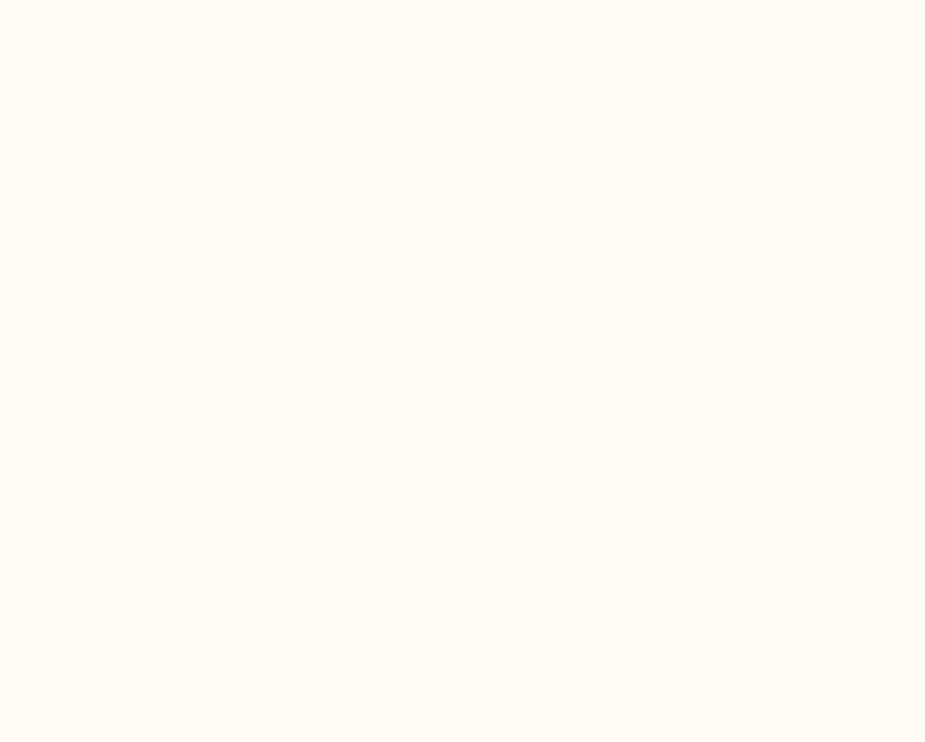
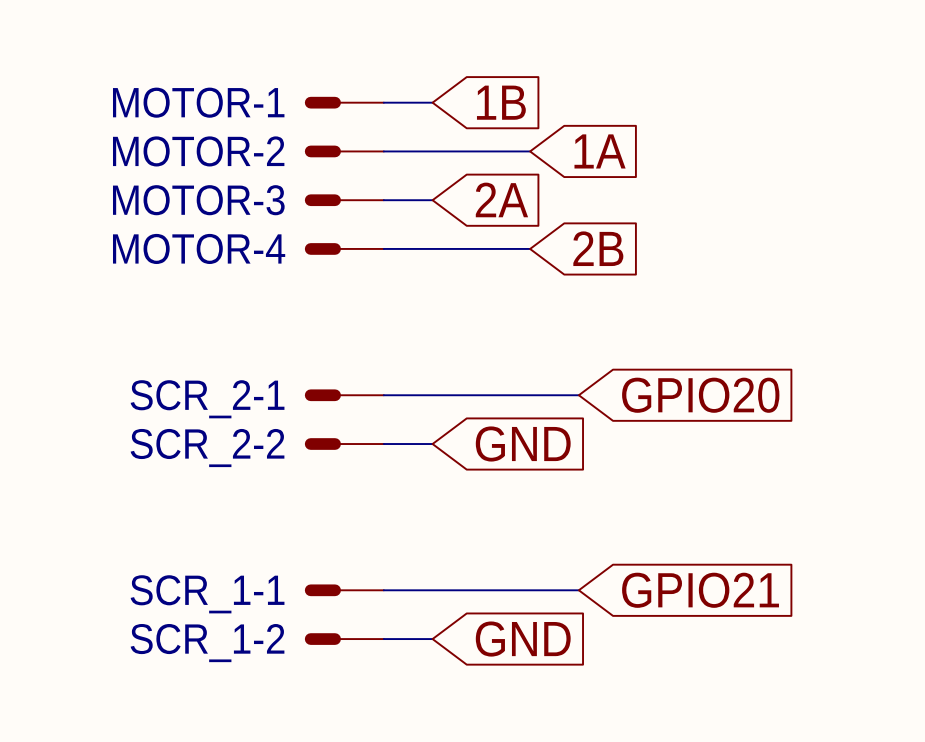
MOTOR-1: none -> (344, 102)
wire: none -> (383, 102) (432, 102)
global label: none -> 1B (501, 102)
MOTOR-2: none -> (344, 151)
wire: none -> (383, 151) (530, 151)
global label: none -> 1A (600, 151)
global label: none -> 2A (501, 199)
MOTOR-3: none -> (344, 200)
wire: none -> (383, 200) (432, 200)
MOTOR-4: none -> (344, 248)
wire: none -> (383, 248) (530, 248)
global label: none -> 2B (598, 248)
SCR_2-1: none -> (344, 395)
wire: none -> (383, 395) (578, 395)
global label: none -> GPIO20 (700, 395)
SCR_2-2: none -> (344, 444)
wire: none -> (383, 444) (432, 444)
global label: none -> GND (523, 444)
SCR_1-1: none -> (344, 590)
wire: none -> (383, 590) (578, 590)
global label: none -> GPIO21 (700, 590)
SCR_1-2: none -> (344, 639)
wire: none -> (383, 639) (432, 639)
global label: none -> GND (523, 639)

